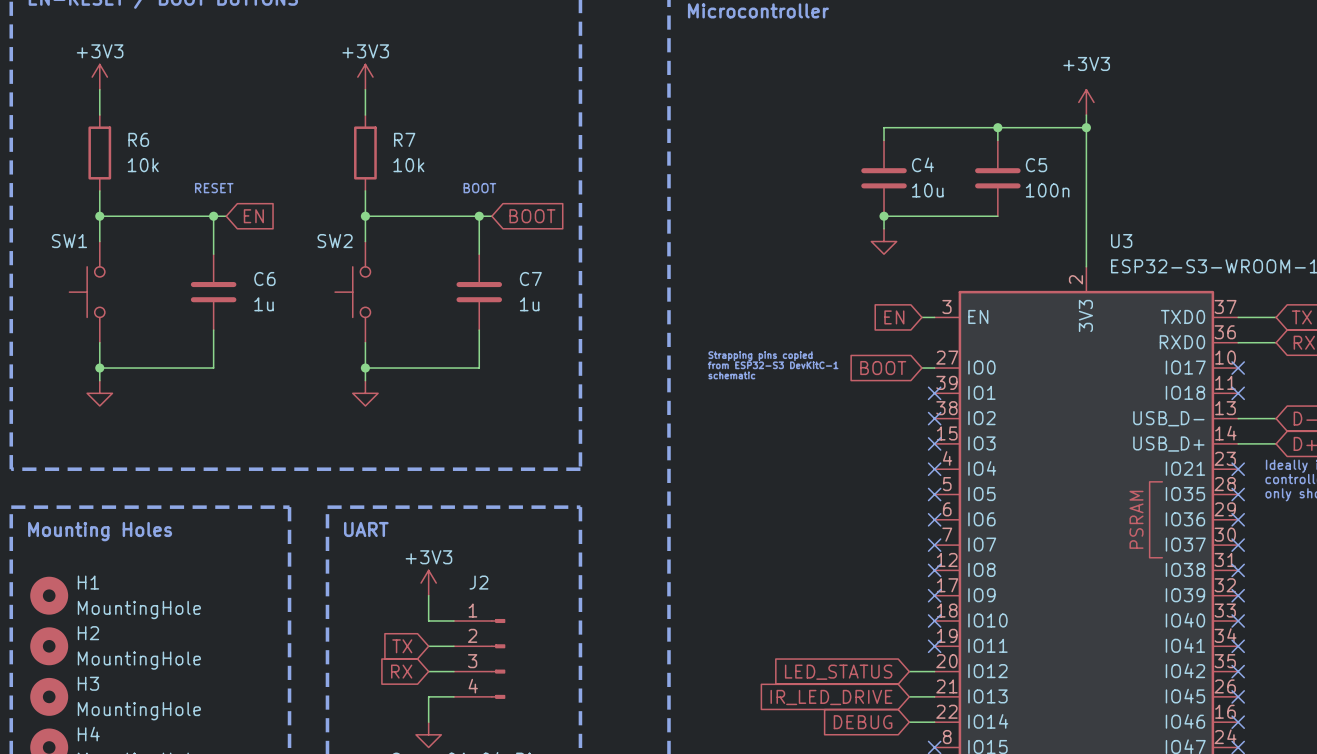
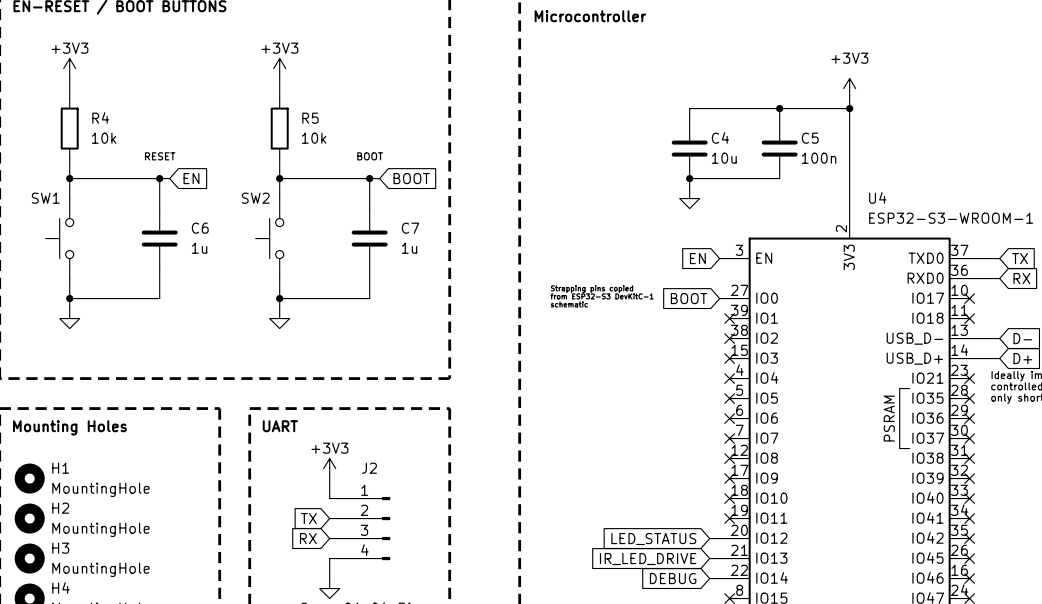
R6 name: R6 (138, 139) -> R4 (100, 117)
R7 name: R7 (404, 139) -> R5 (310, 118)
U3 name: U3 (1121, 241) -> U4 (877, 197)

